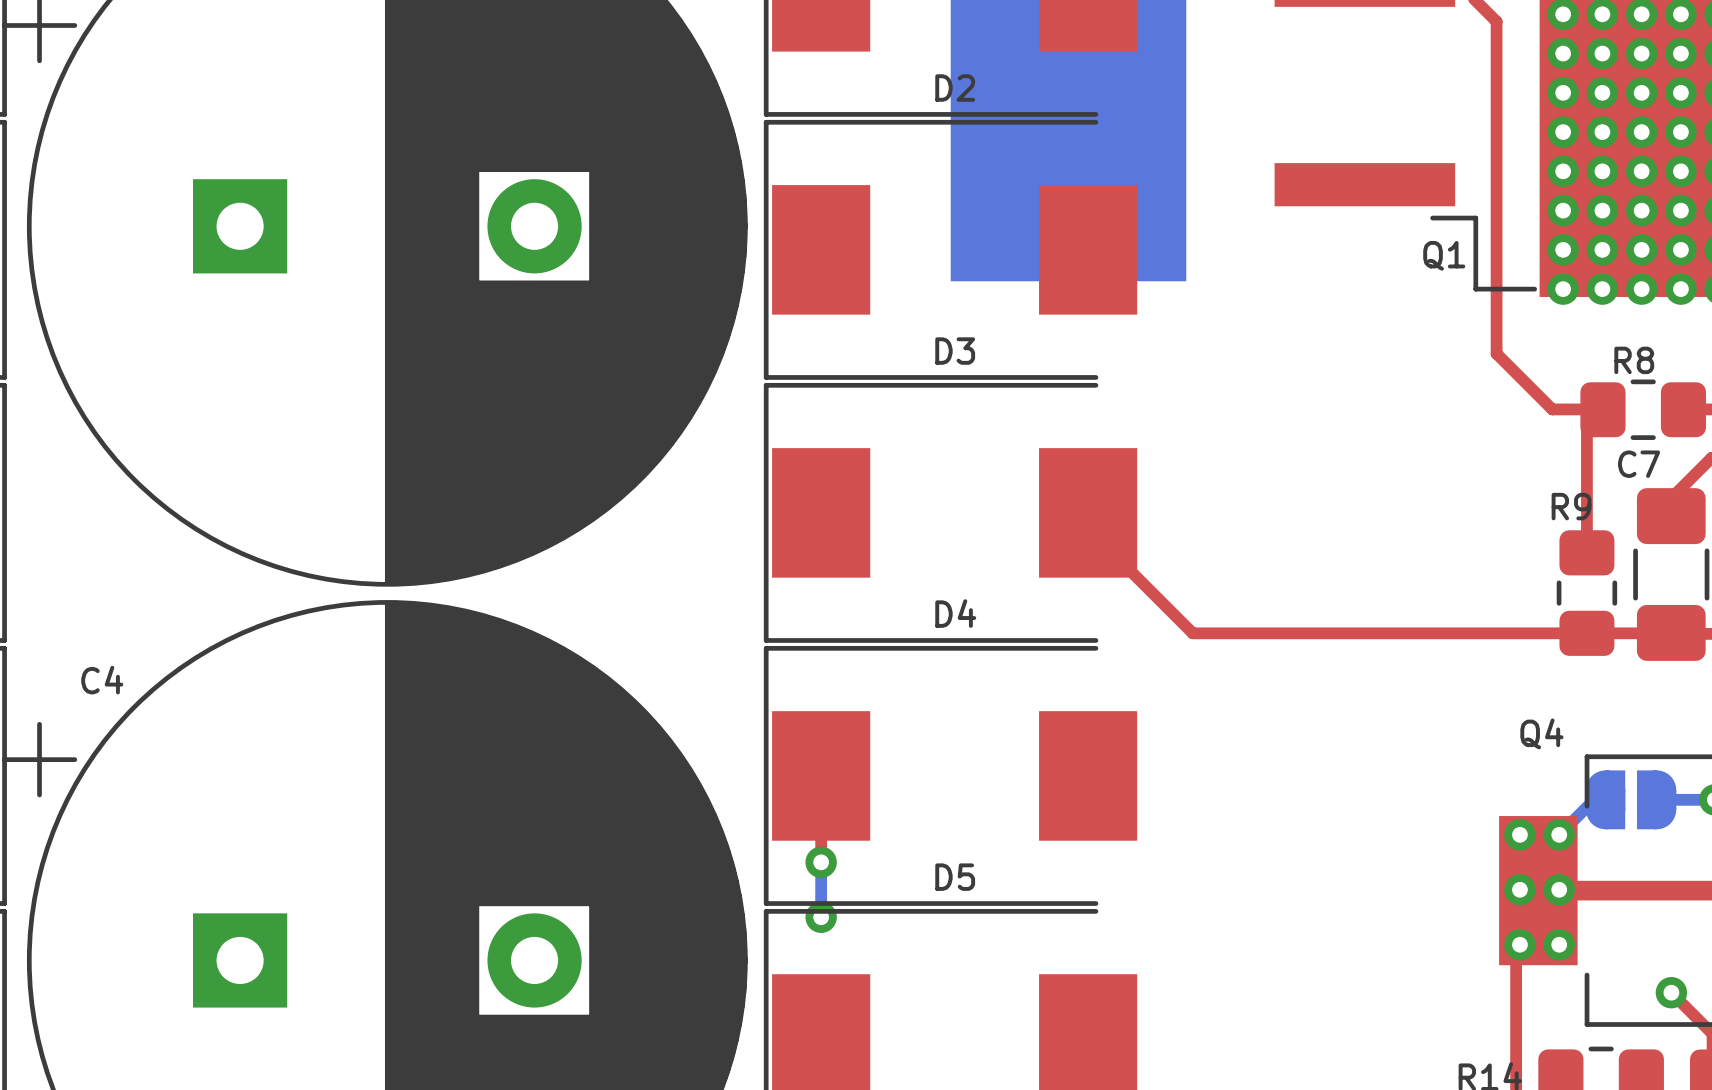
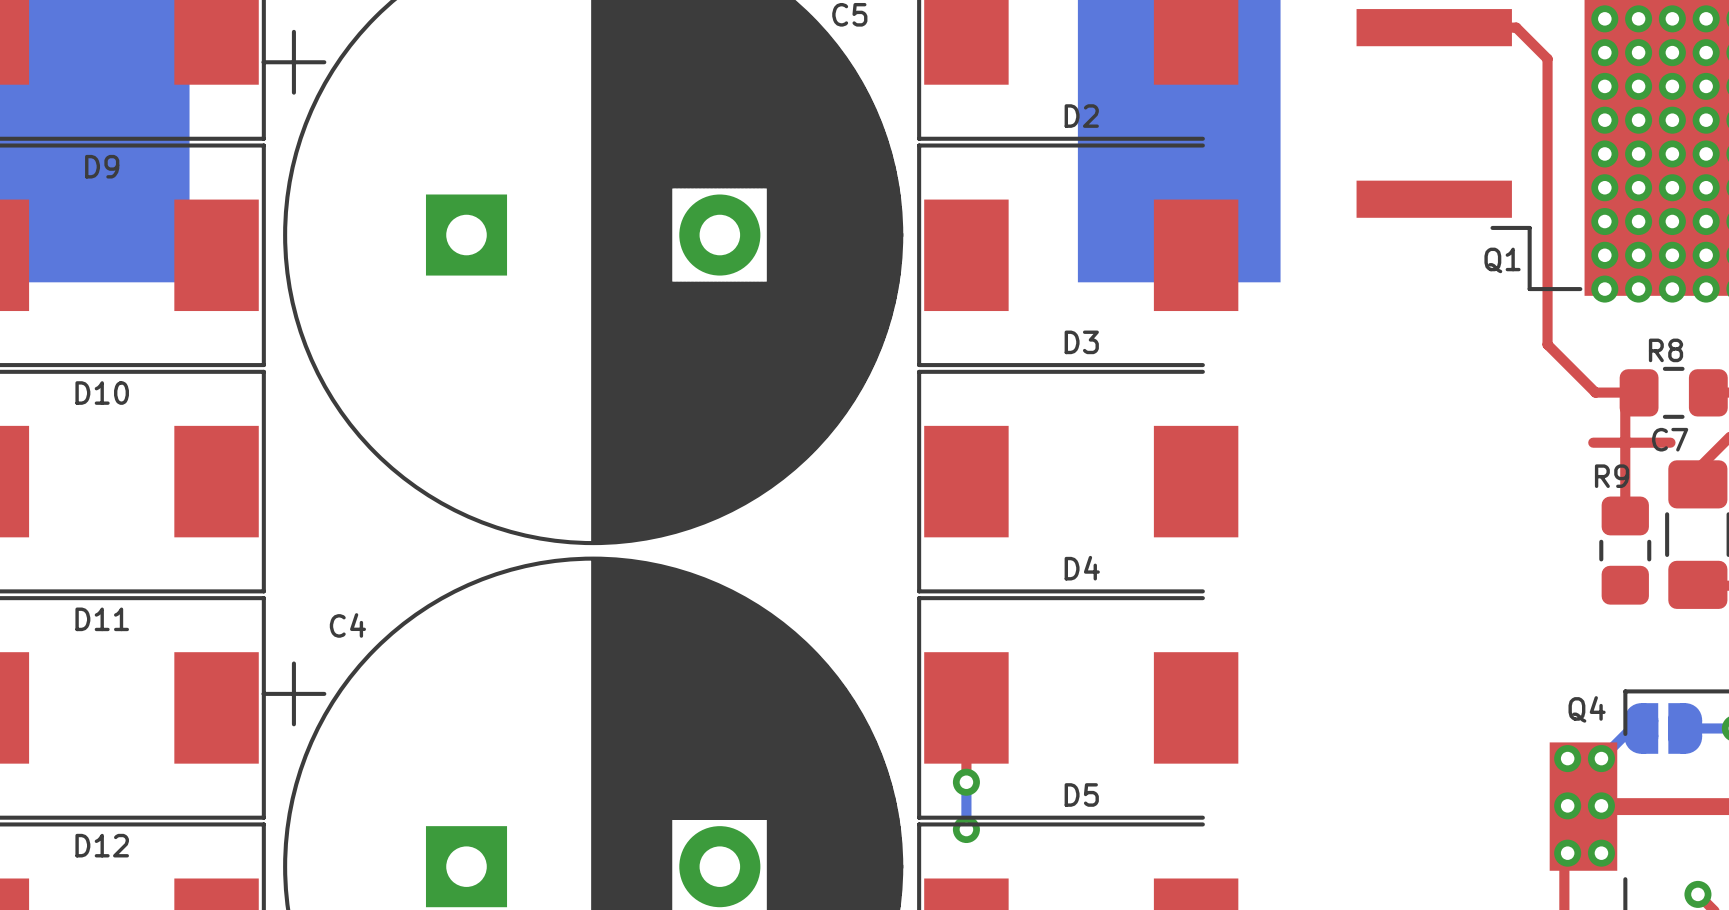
top track: none -> (1593, 442) (1670, 442)
top track: (1088, 512) (1088, 528) (1192, 633) (1670, 633) -> none
Q4 name position: Q4 (1541, 733) -> Q4 (1587, 709)

